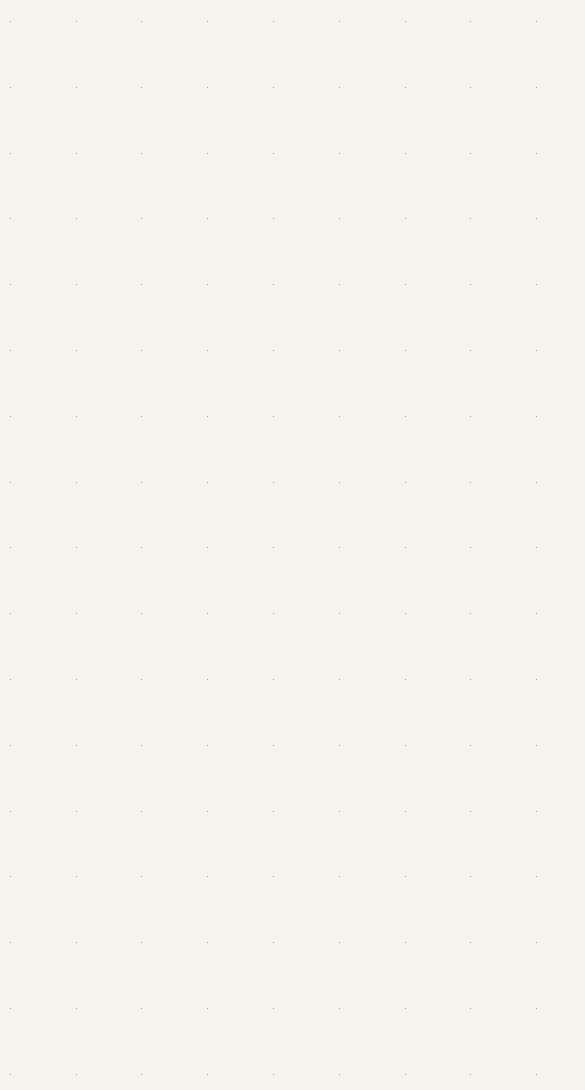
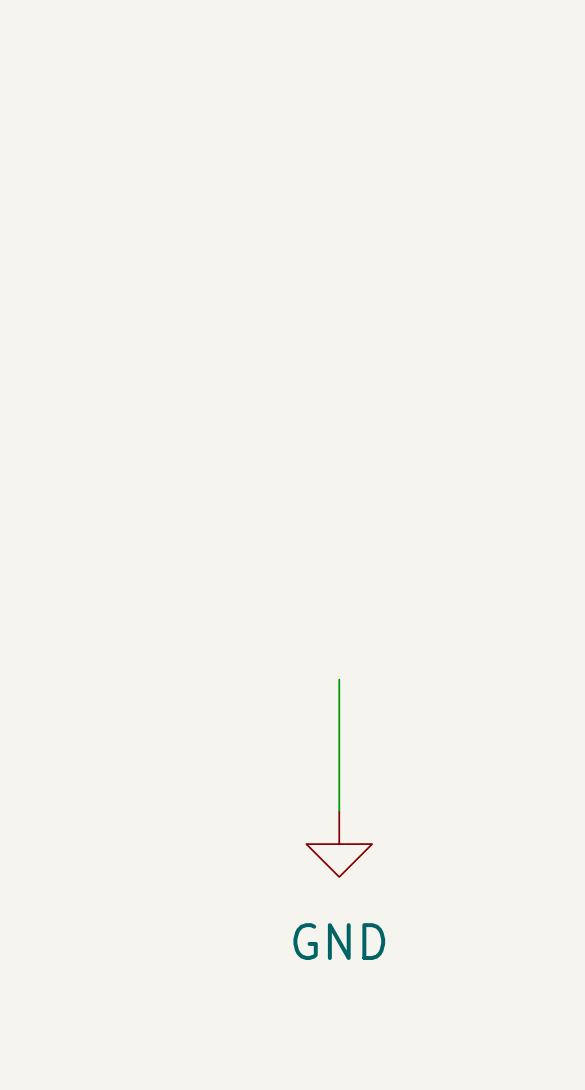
wire: none -> (339, 679) (339, 811)
power symbol: none -> GND (339, 844)

